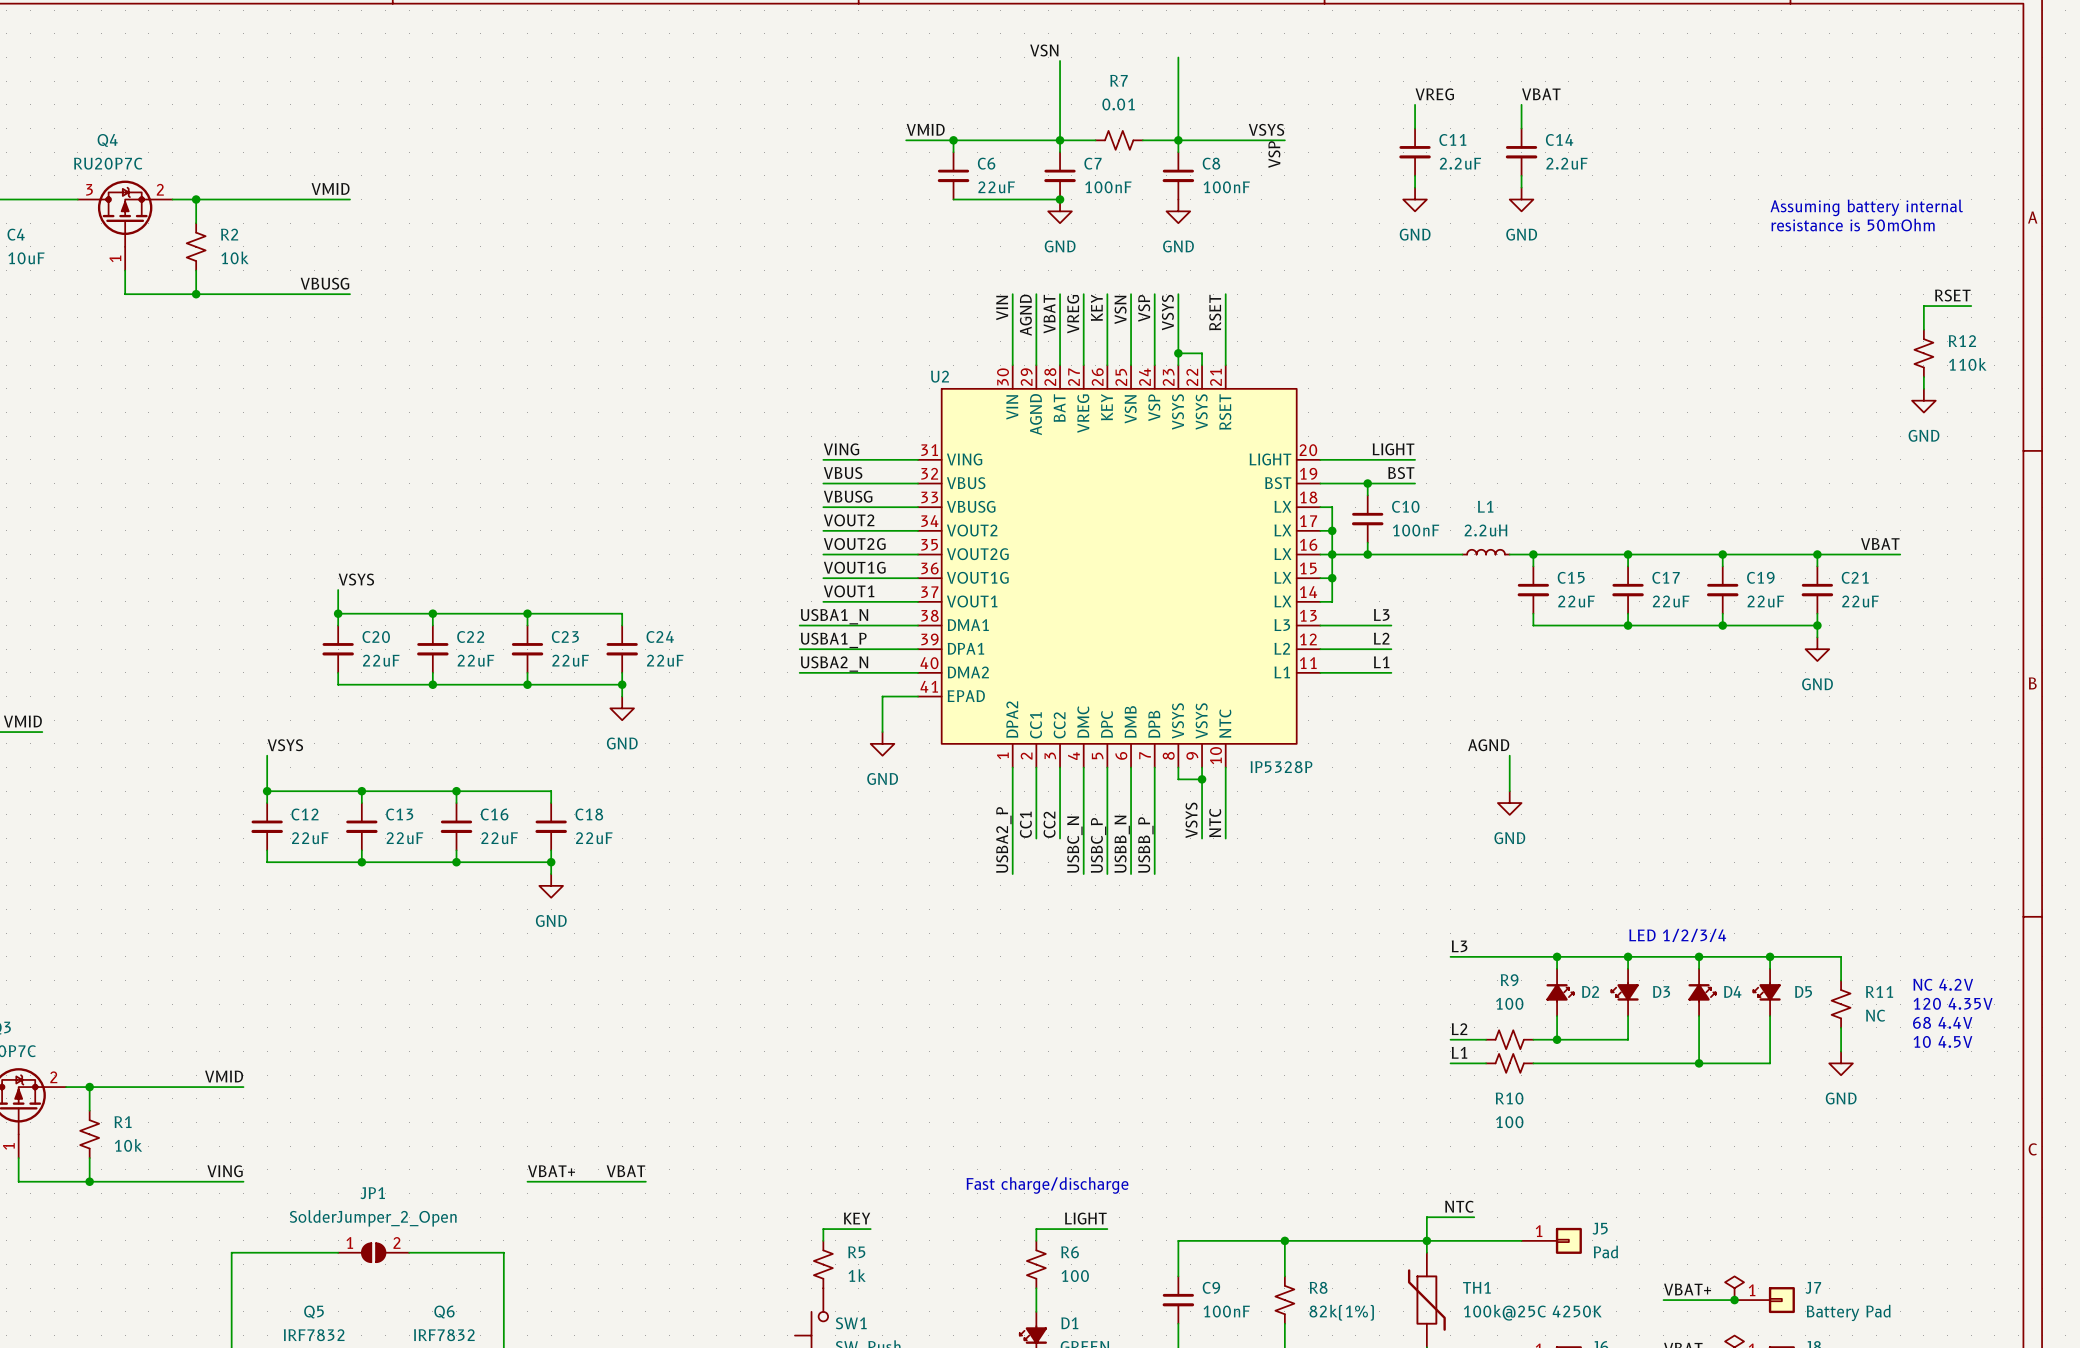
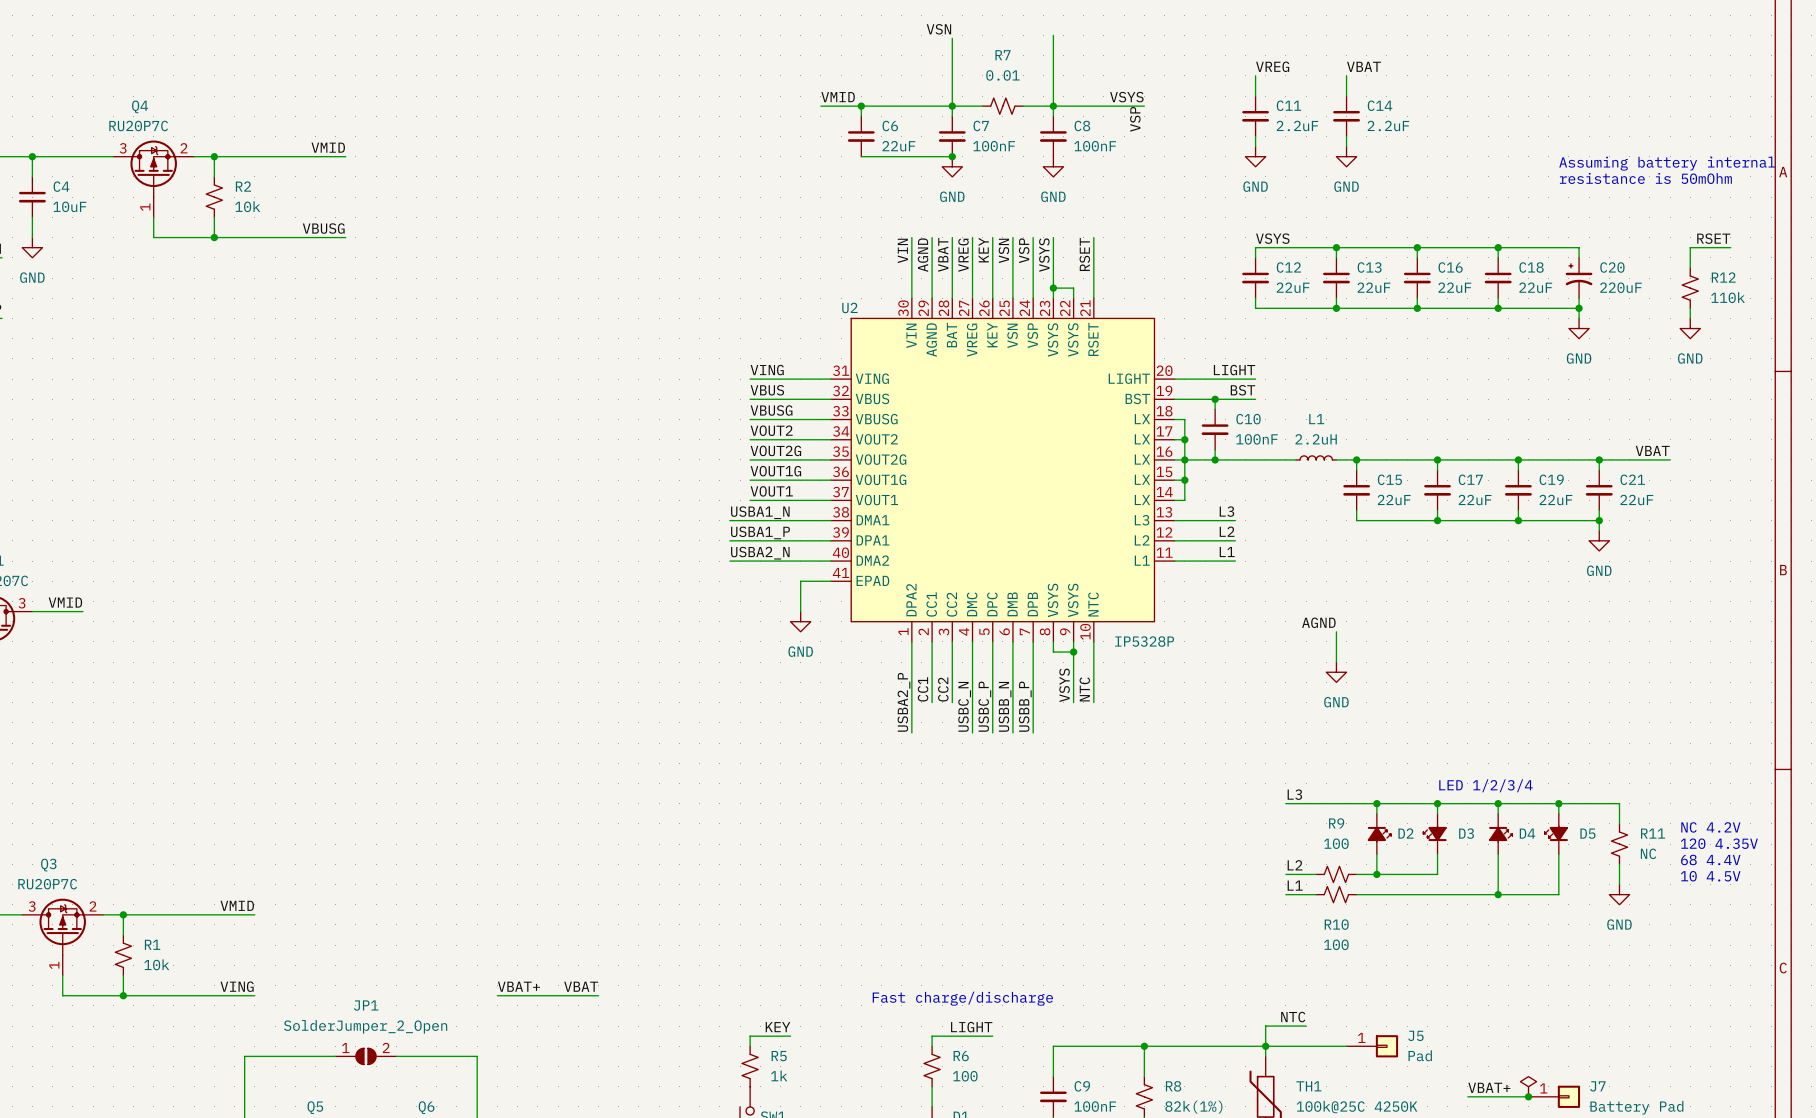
label: none -> VSYS (1272, 238)
wire: none -> (1336, 247) (1336, 257)
junction: none -> (1336, 247)
wire: none -> (1417, 247) (1417, 257)
junction: none -> (1417, 247)
wire: none -> (1498, 247) (1498, 257)
junction: none -> (1498, 247)
wire: none -> (1255, 257) (1255, 247) (1579, 247) (1579, 257)
wire: none -> (1255, 298) (1255, 308) (1579, 308)
wire: none -> (1336, 298) (1336, 308)
wire: none -> (1417, 298) (1417, 308)
wire: none -> (1498, 298) (1498, 308)
wire: none -> (1579, 298) (1579, 318)
junction: none -> (1336, 308)
junction: none -> (1417, 308)
junction: none -> (1498, 308)
junction: none -> (1579, 308)
power symbol: none -> GND (1579, 328)
label: VSYS (356, 579) -> none
wire: (338, 590) (338, 625) -> none
wire: (338, 613) (622, 613) (622, 625) -> none
junction: (338, 613) -> none
wire: (432, 613) (432, 625) -> none
junction: (432, 613) -> none
wire: (527, 613) (527, 625) -> none
junction: (527, 613) -> none
C20 symbol: [322, 625, 354, 673] -> [1565, 257, 1593, 299]
C22: 22uF (432, 649) -> none
C23: 22uF (527, 649) -> none
C24: 22uF (622, 649) -> none
C20 value: 22uF (381, 660) -> 220uF (1620, 287)
wire: (338, 672) (338, 684) (622, 684) -> none
wire: (432, 672) (432, 684) -> none
wire: (527, 672) (527, 684) -> none
wire: (622, 672) (622, 696) -> none
junction: (432, 684) -> none
junction: (527, 684) -> none
junction: (622, 684) -> none
power symbol: GND (622, 708) -> none
label: VSYS (285, 745) -> none
wire: (267, 755) (267, 803) -> none
wire: (267, 791) (551, 791) (551, 803) -> none
junction: (267, 791) -> none
wire: (361, 791) (361, 803) -> none
junction: (361, 791) -> none
wire: (456, 791) (456, 803) -> none
junction: (456, 791) -> none
C12 position: (267, 826) -> (1255, 278)
C13 position: (361, 826) -> (1336, 278)
C16 position: (456, 826) -> (1417, 278)
C18 position: (551, 826) -> (1498, 278)
wire: (267, 850) (267, 862) (551, 862) -> none
wire: (361, 850) (361, 862) -> none
wire: (456, 850) (456, 862) -> none
wire: (551, 850) (551, 874) -> none
junction: (361, 862) -> none
junction: (456, 862) -> none
junction: (551, 862) -> none
power symbol: GND (551, 885) -> none

